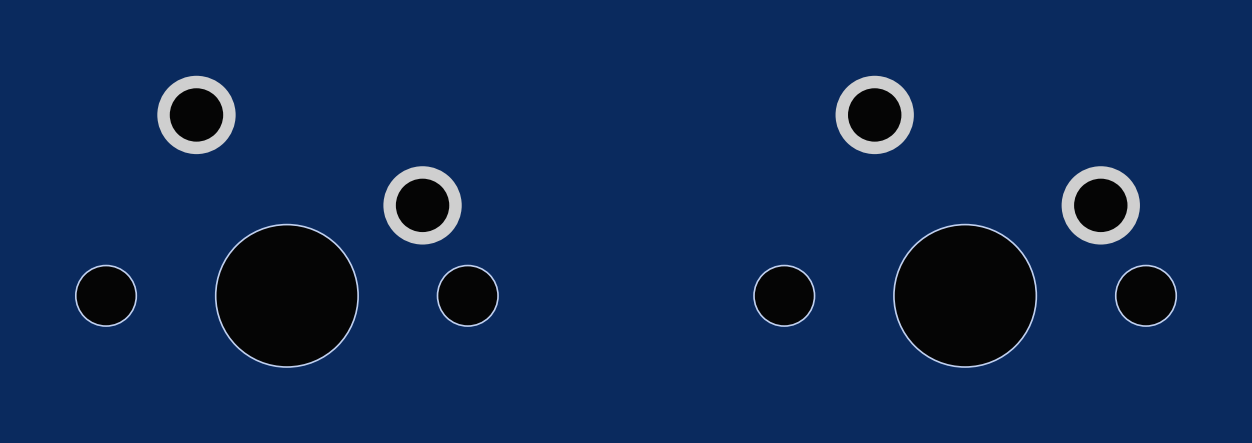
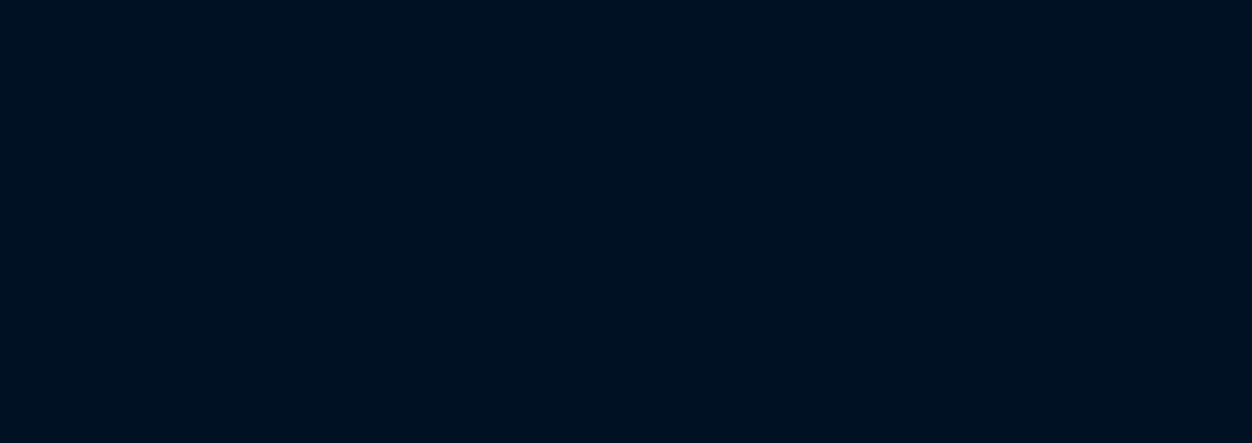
part: (286, 221) -> none
part: (965, 221) -> none

